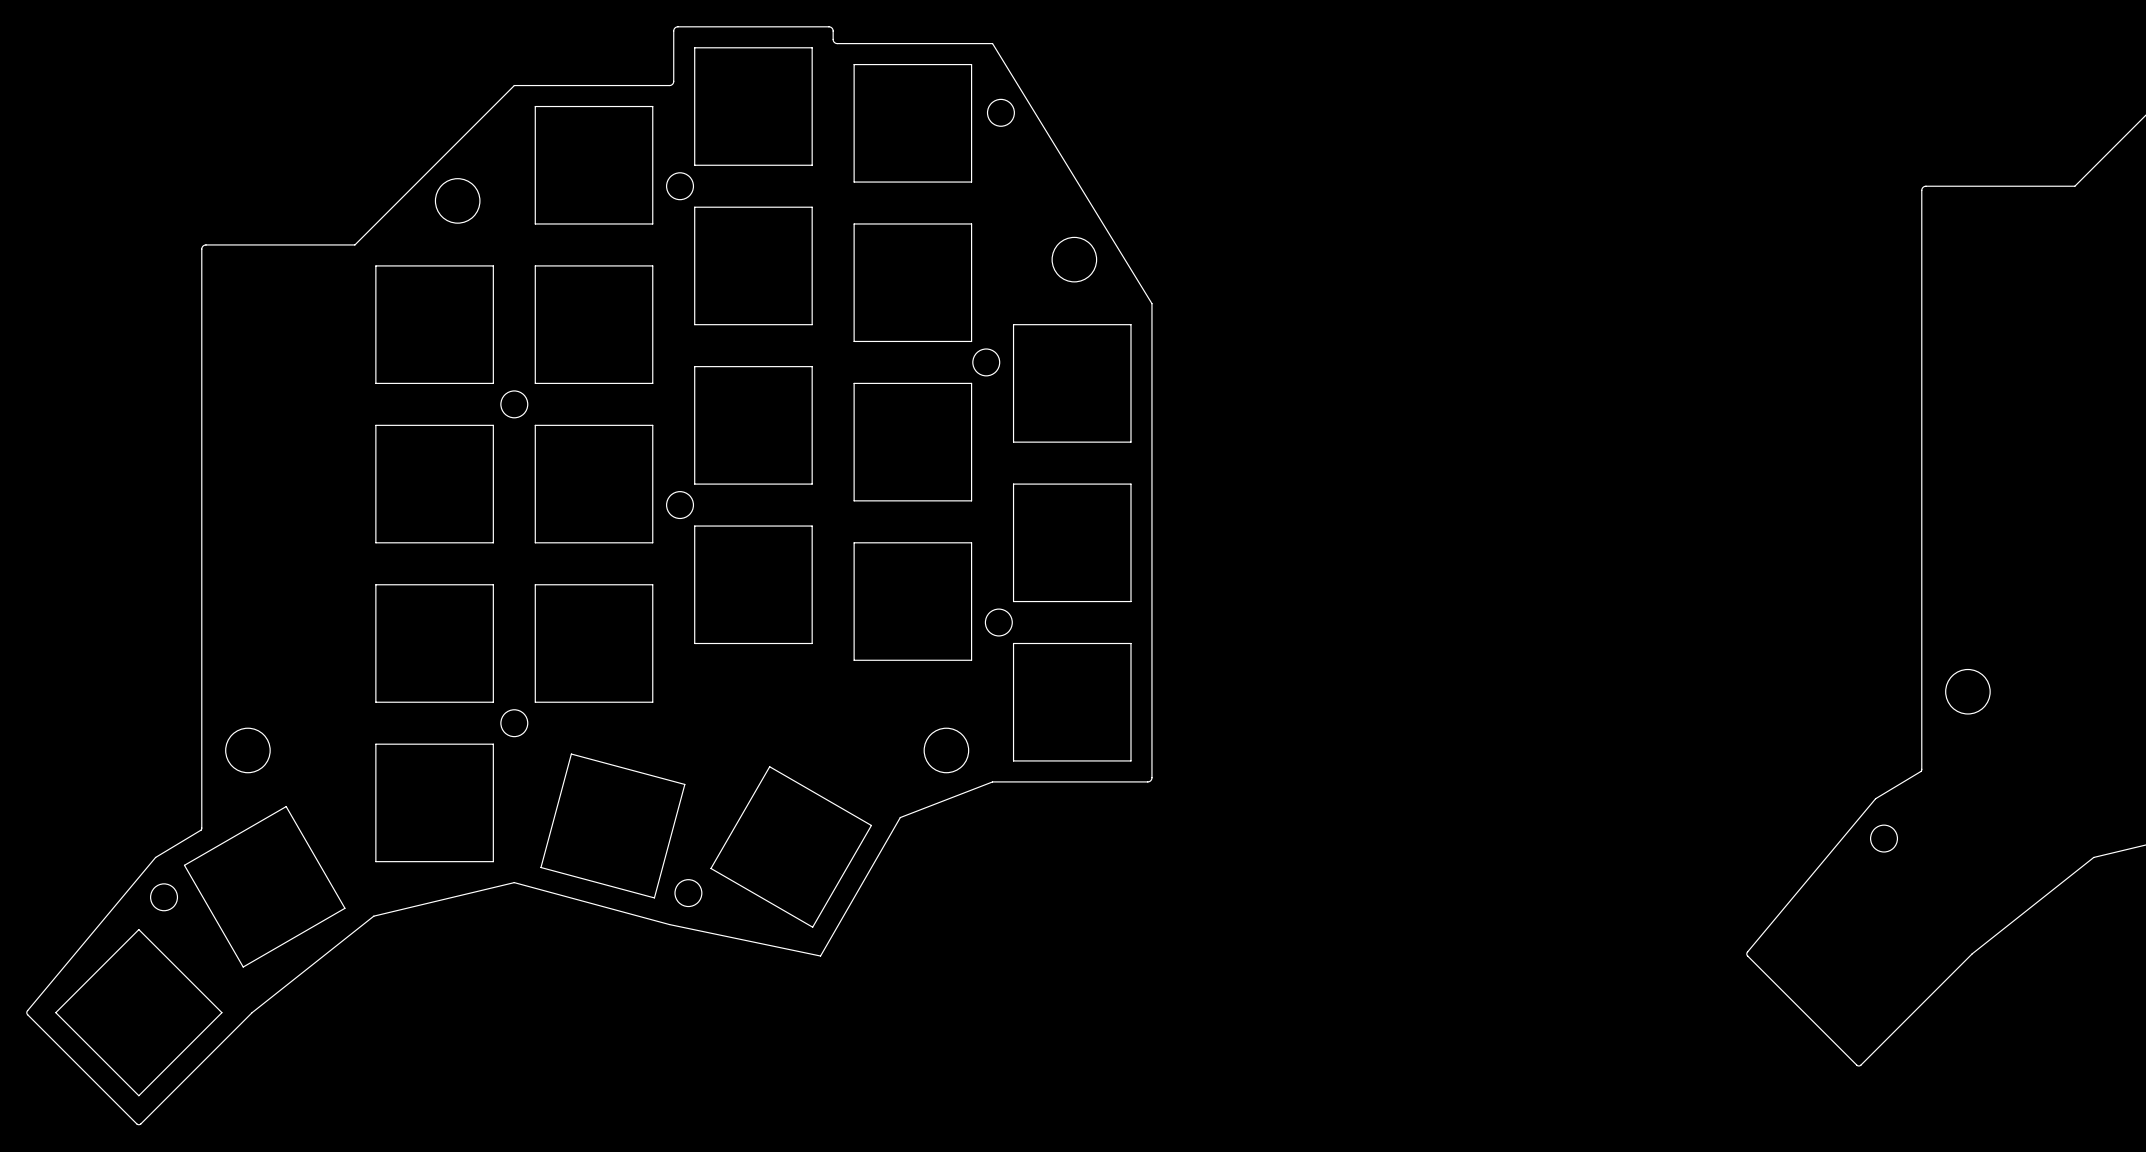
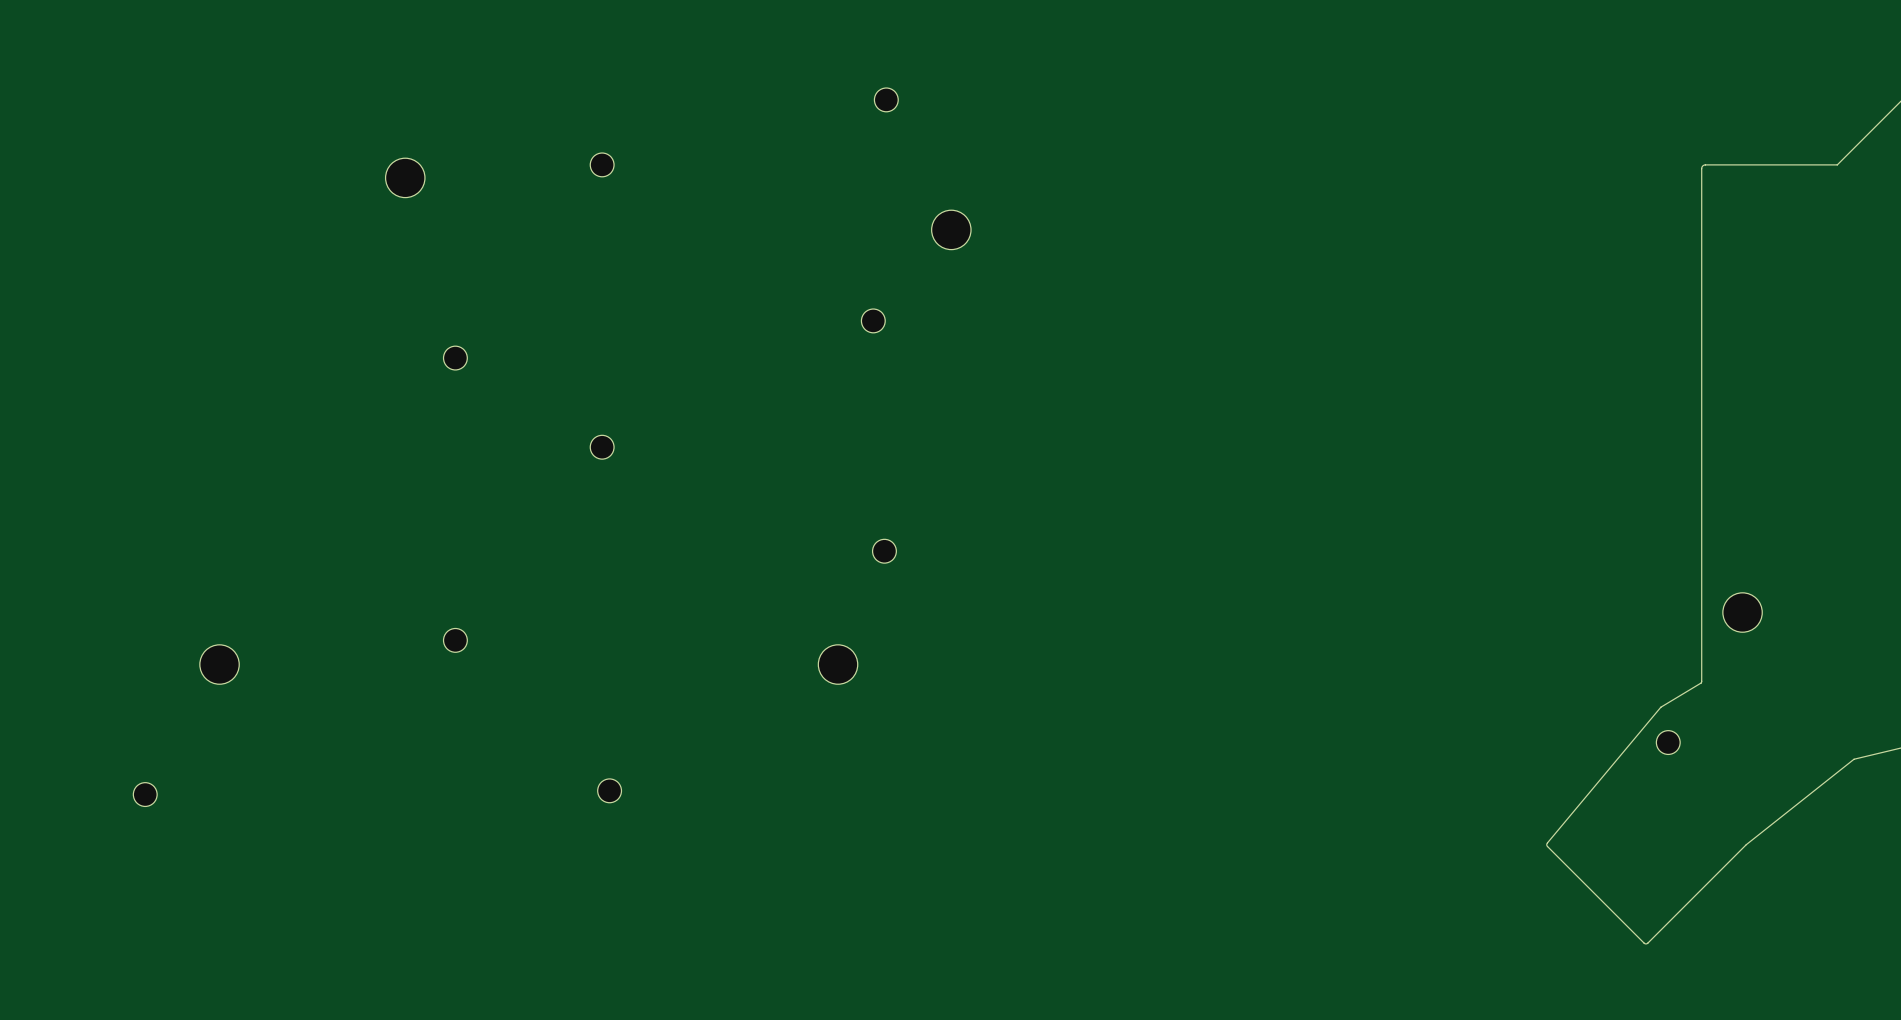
board edge: (828, 26) (676, 27) (673, 30) (673, 81) (672, 84) (514, 85) (354, 244) (205, 244) (202, 247) (201, 829) (155, 857) (26, 1012) (137, 1124) (140, 1123) (252, 1012) (373, 916) (514, 882) (669, 924) (820, 956) (900, 817) (992, 781) (1147, 781) (1151, 779) (1151, 303) (992, 43) (836, 43) (833, 40) (832, 29) (828, 26) -> none
drawing: [694, 47, 813, 166] -> none
drawing: [853, 64, 973, 183] -> none
drawing: [534, 106, 654, 225] -> none
drawing: [694, 206, 813, 326] -> none
drawing: [853, 223, 973, 342] -> none
drawing: [375, 265, 494, 384] -> none
drawing: [534, 265, 654, 384] -> none
drawing: [1013, 324, 1132, 443] -> none
drawing: [694, 366, 813, 485] -> none
drawing: [853, 382, 973, 502] -> none
drawing: [375, 424, 494, 544] -> none
drawing: [534, 424, 654, 544] -> none
drawing: [1013, 483, 1132, 603] -> none
drawing: [694, 525, 813, 645] -> none
drawing: [853, 542, 973, 661] -> none
drawing: [375, 584, 494, 703] -> none
drawing: [534, 584, 654, 703] -> none
drawing: [1013, 642, 1132, 762] -> none
drawing: [375, 743, 494, 863] -> none
drawing: [540, 753, 686, 899] -> none
drawing: [710, 766, 872, 928] -> none
drawing: [55, 806, 346, 1097] -> none

